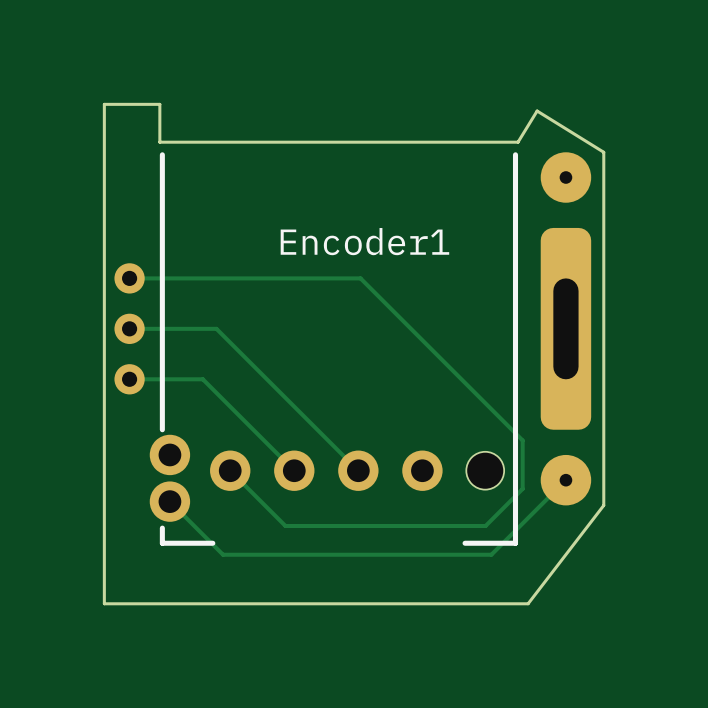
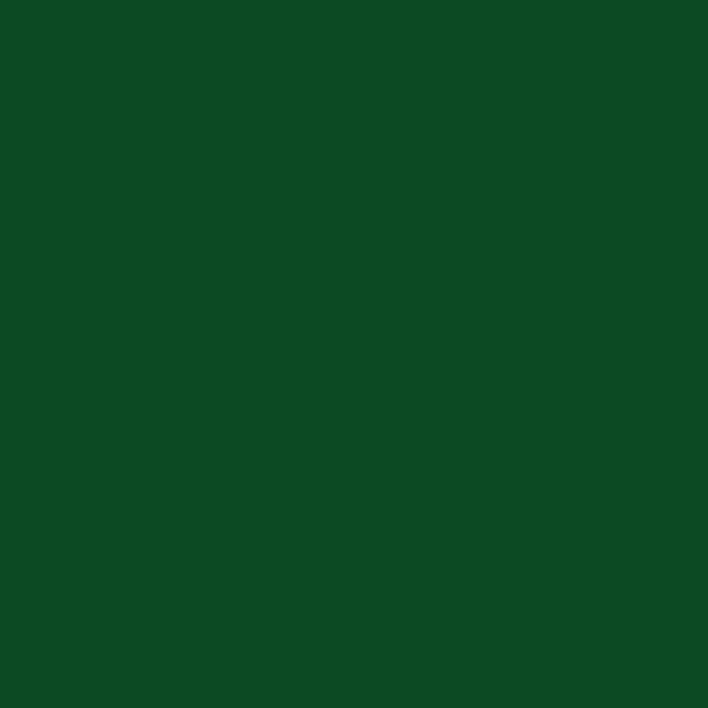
track: (129, 278) (360, 278) (522, 440) (522, 488) (485, 525) (285, 525) (230, 470) -> none
track: (129, 328) (216, 328) (358, 470) -> none
Encoder1: (333, 349) -> none
part: (354, 354) -> none
track: (129, 379) (202, 379) (294, 470) -> none
track: (565, 480) (491, 554) (223, 554) (169, 501) -> none

